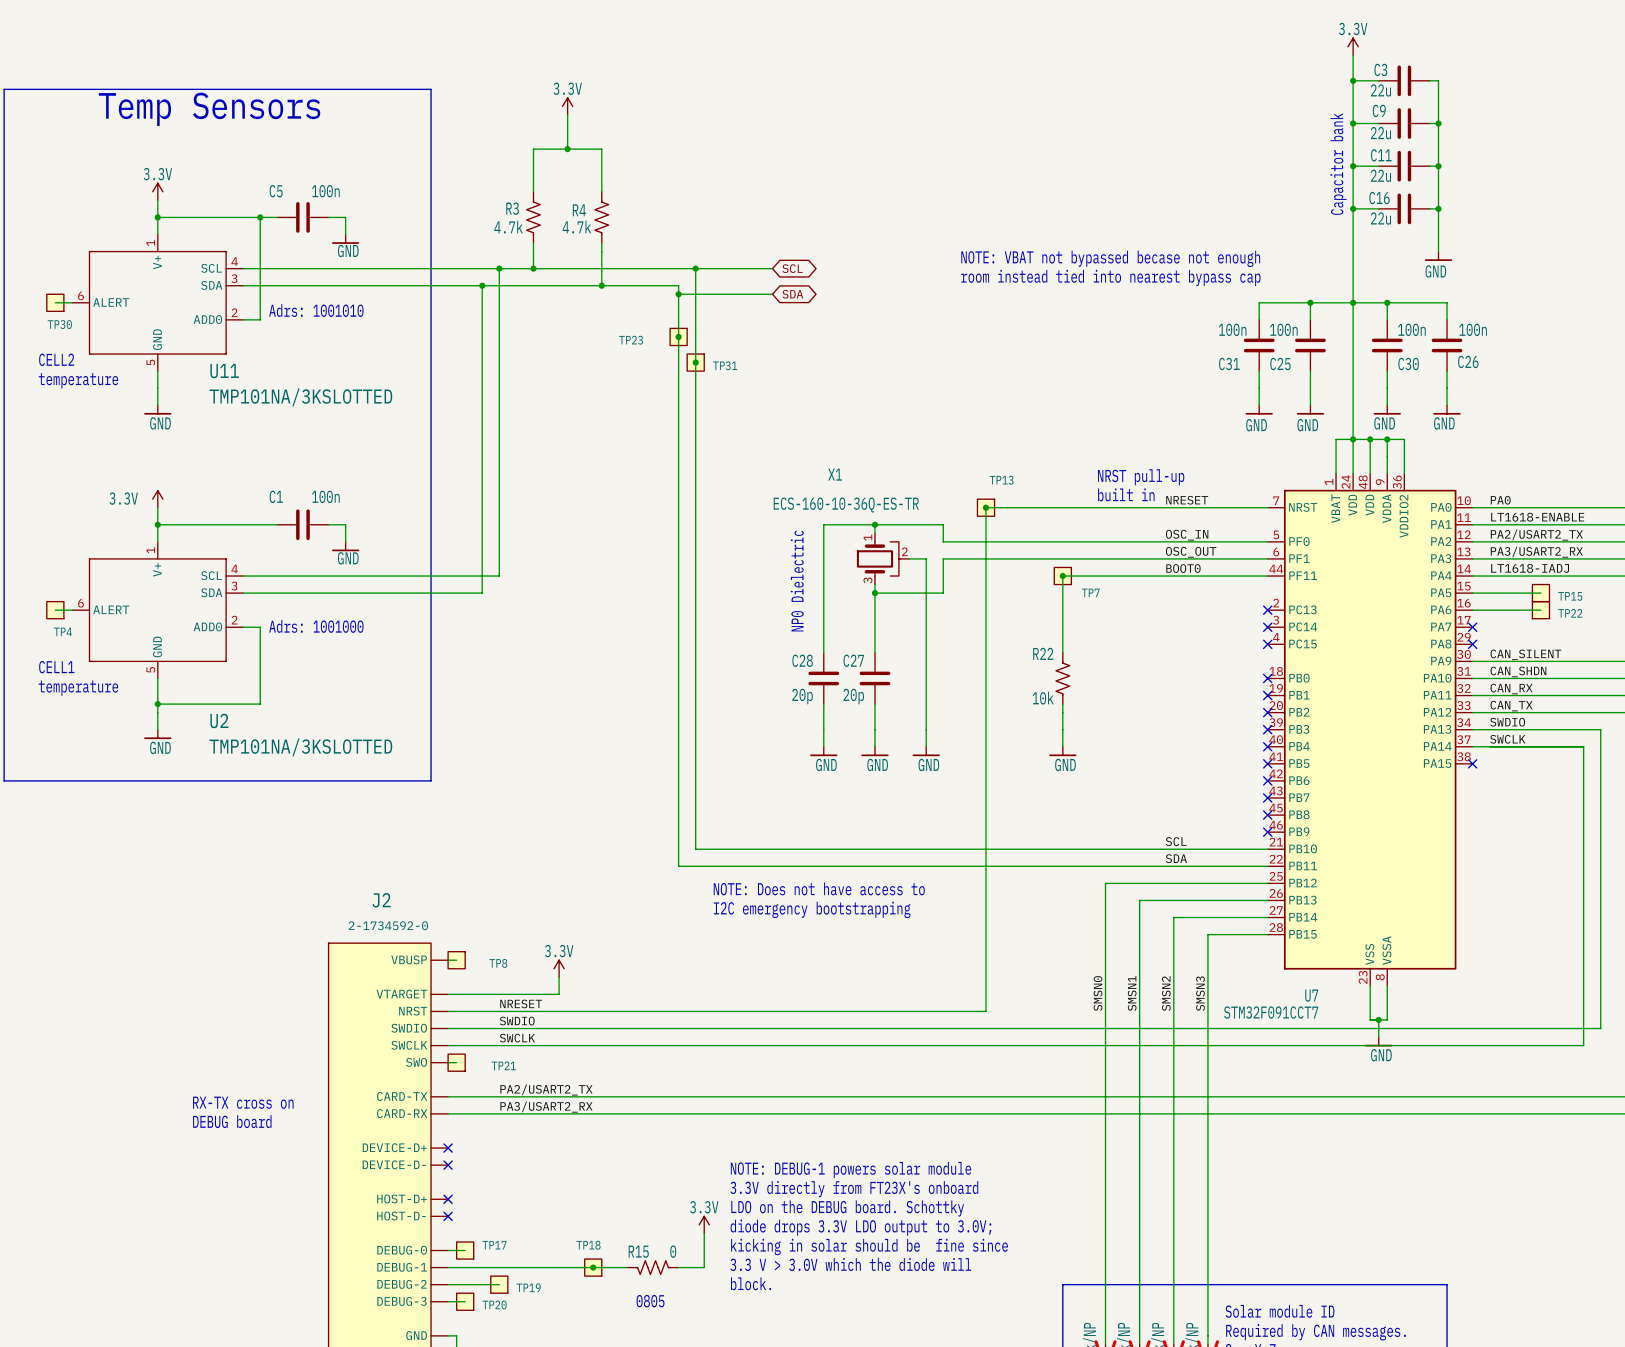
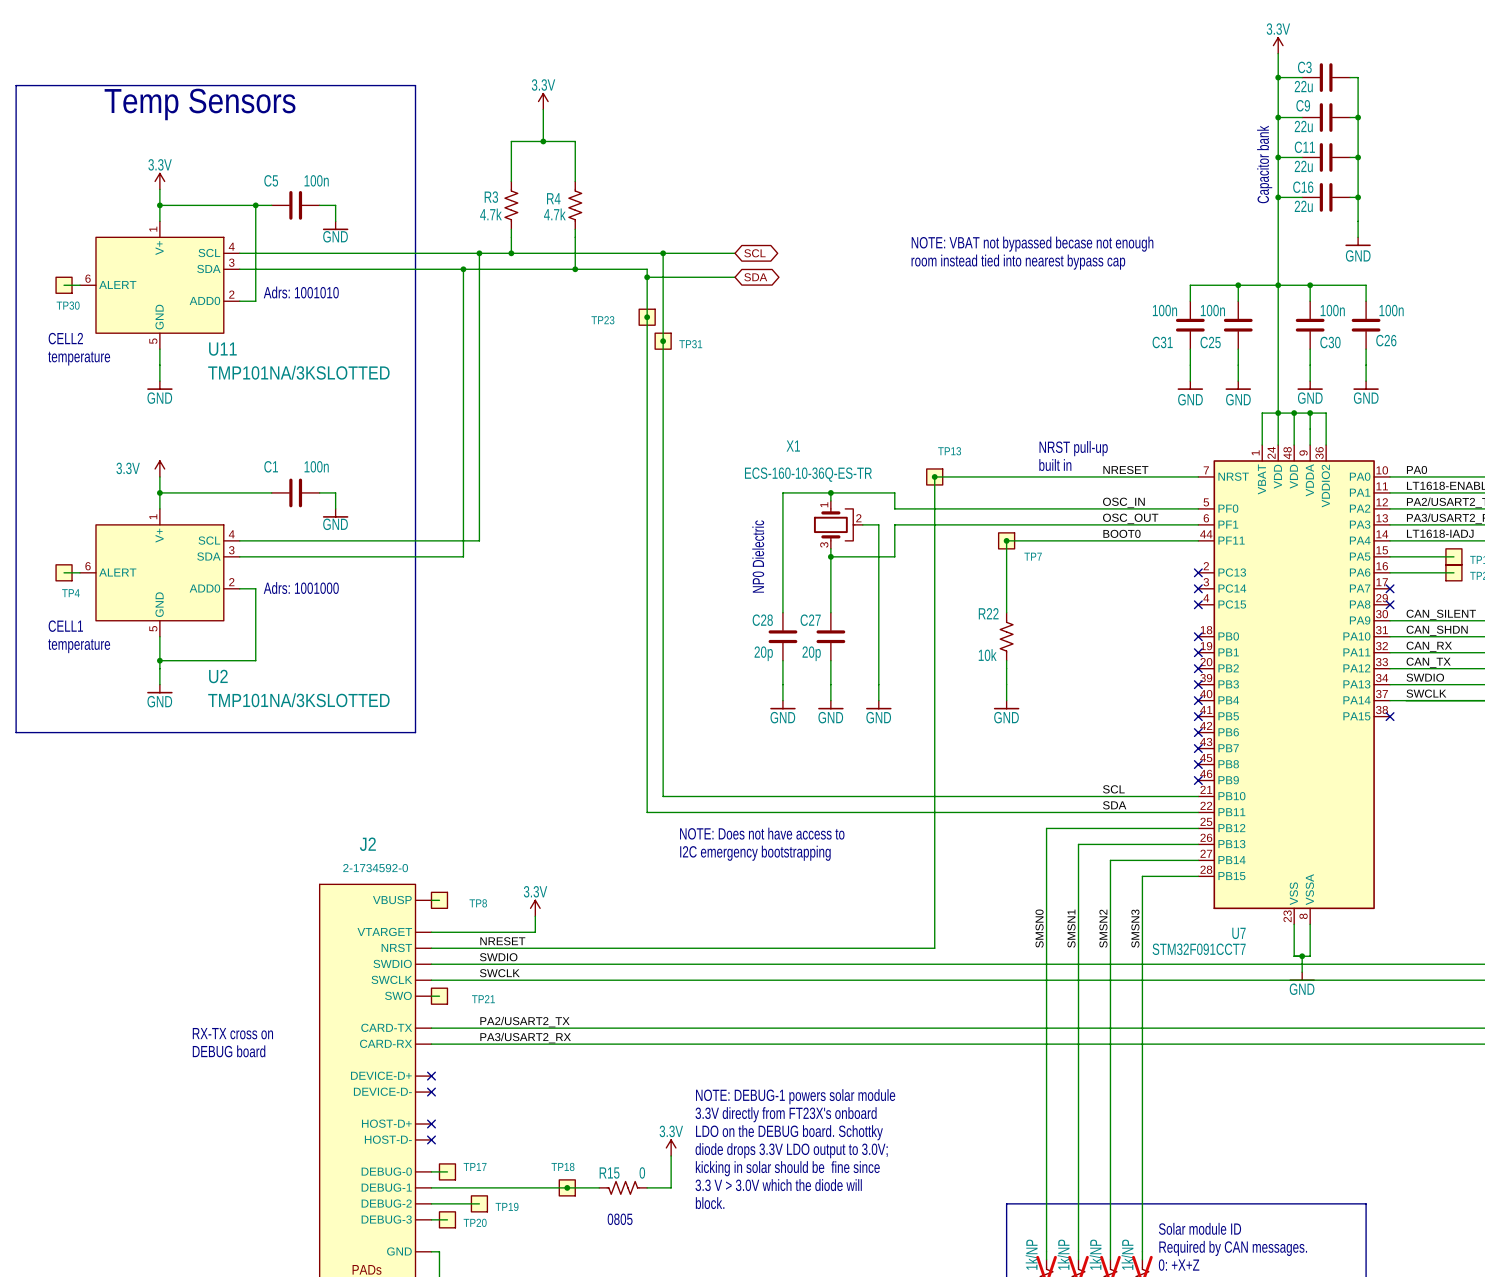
U11 symbol: [72, 234, 244, 372] -> [80, 221, 240, 350]
U2 symbol: [72, 541, 244, 679] -> [80, 508, 240, 637]

